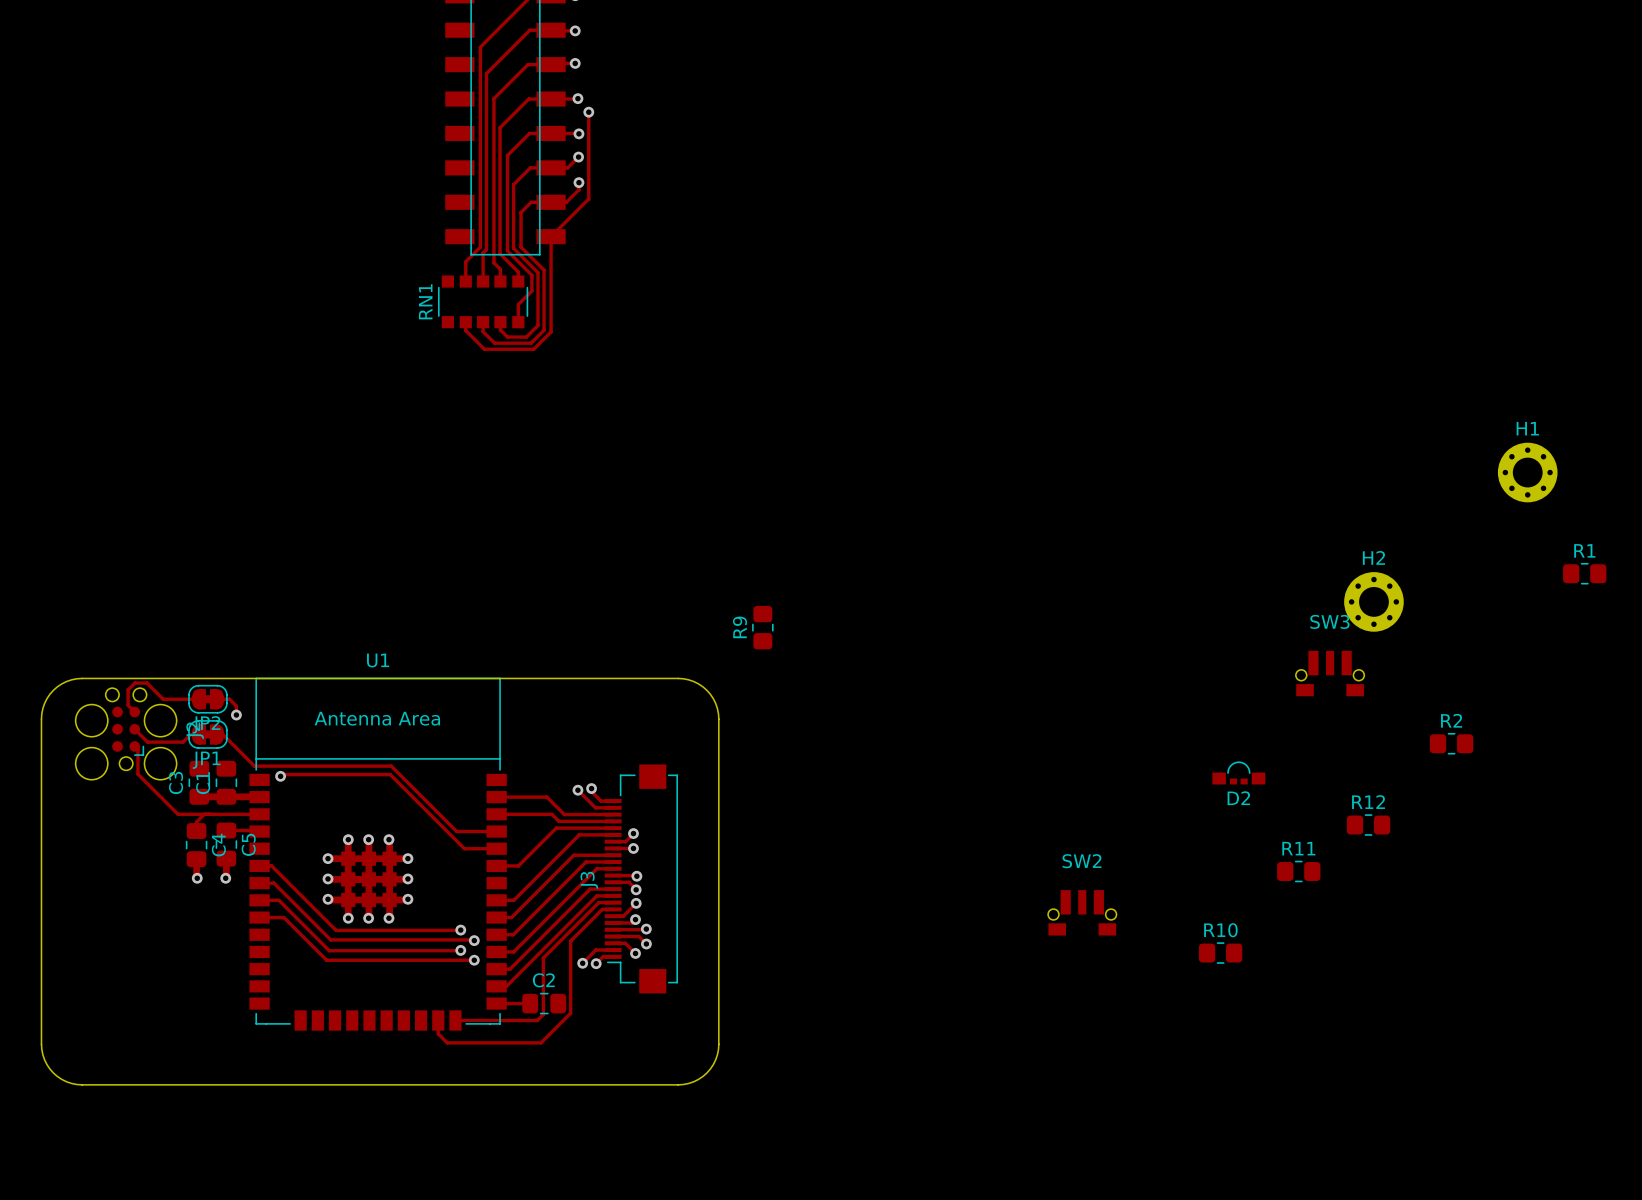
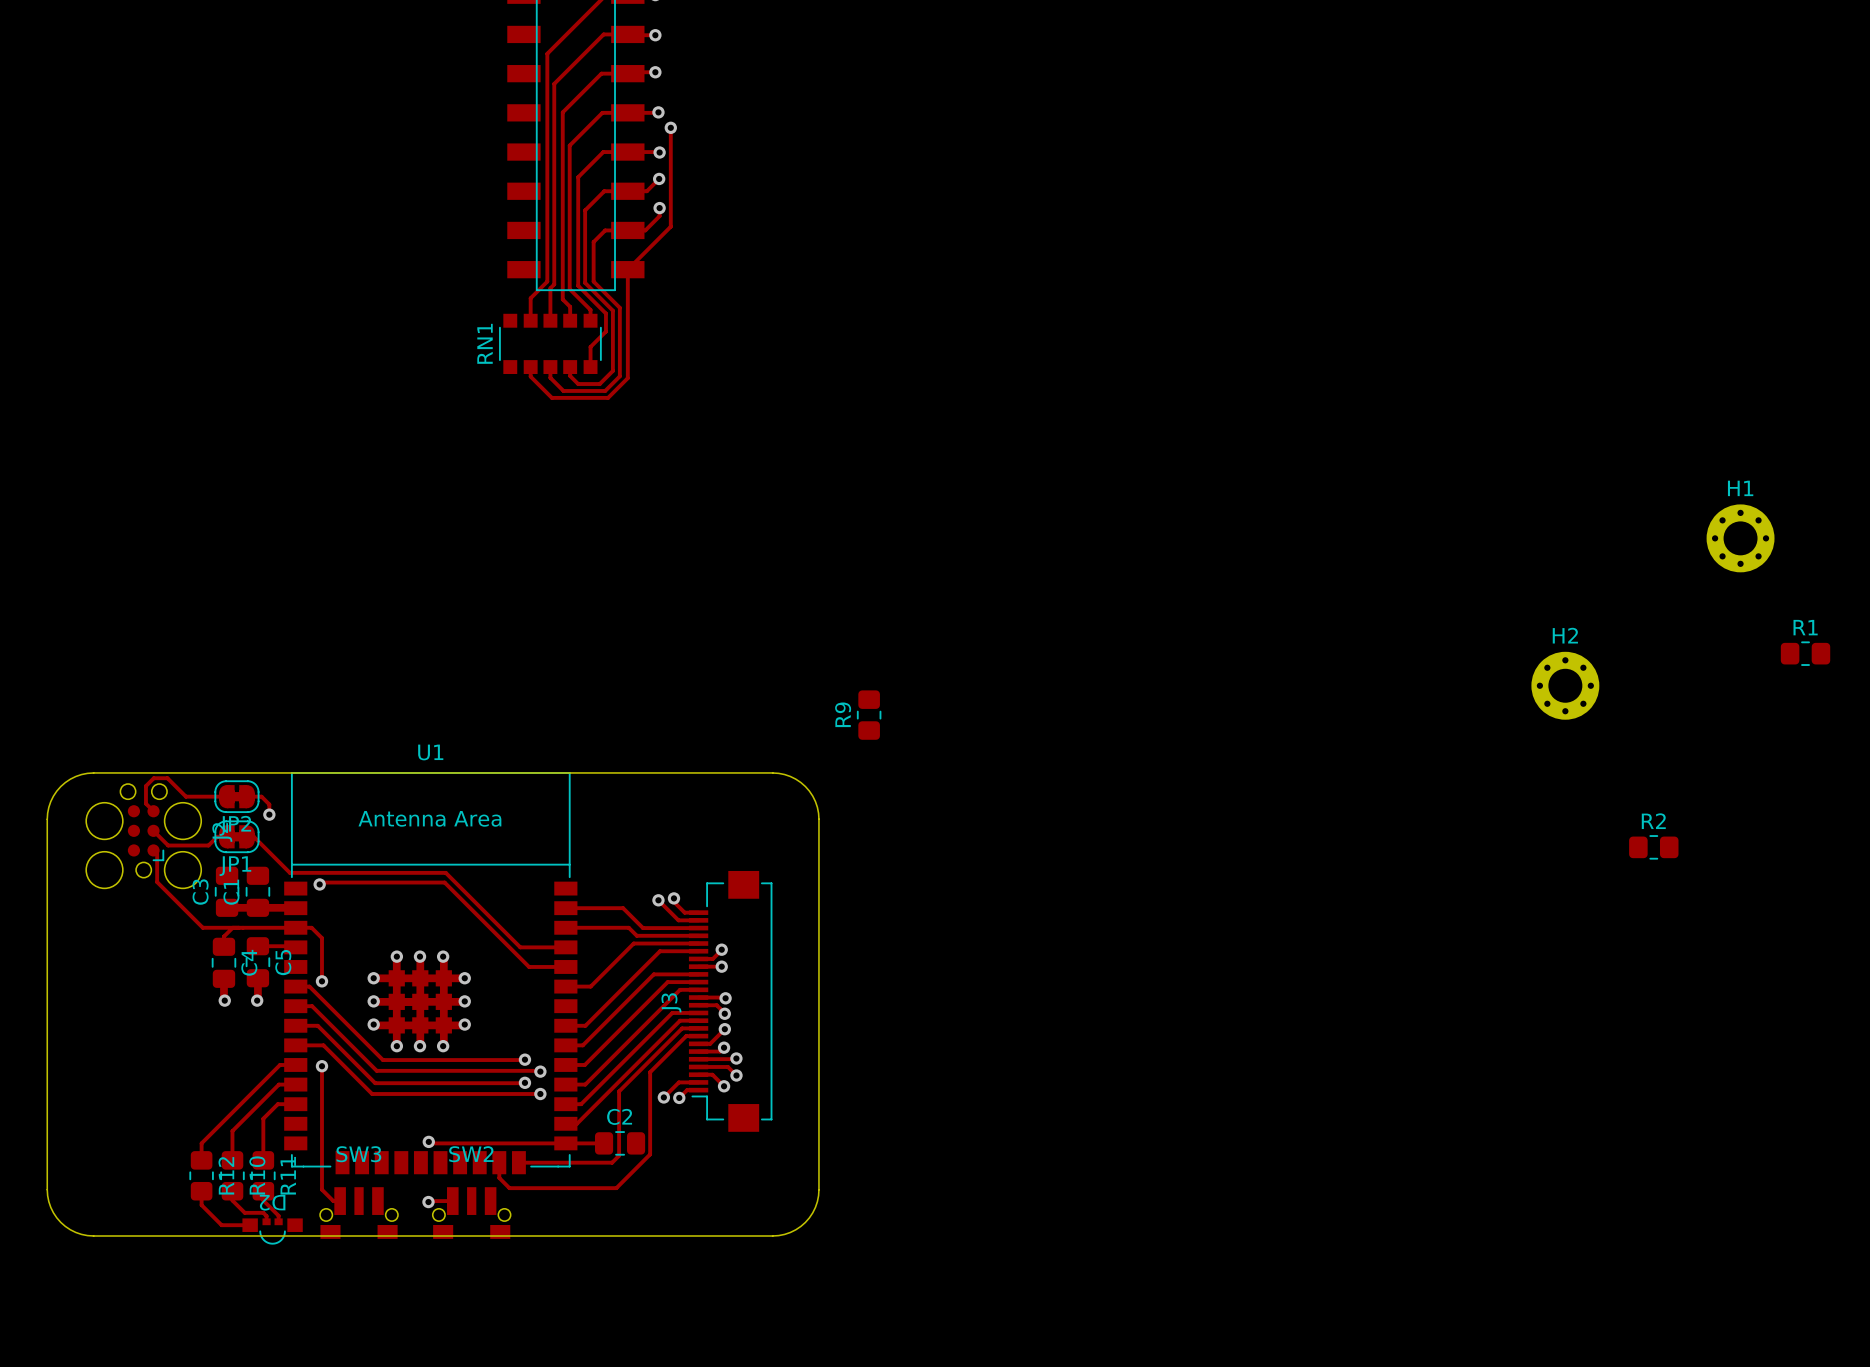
SW3 position: (1330, 673) -> (359, 1213)
D2 rotation: 0° (1236, 772) -> 180° (274, 1231)
D2 position: (1236, 772) -> (274, 1231)
track: none -> (295, 927) (311, 927) (321, 938) (321, 981)
R12 rotation: 0° (1368, 825) -> 90° clockwise (201, 1175)
R12 position: (1368, 825) -> (201, 1175)
via: none -> (321, 981)
R11 rotation: 0° (1298, 871) -> 90° clockwise (263, 1175)
R11 position: (1298, 871) -> (263, 1175)
SW2 position: (1082, 912) -> (471, 1213)
track: none -> (295, 1064) (280, 1064) (201, 1143) (201, 1160)
track: none -> (321, 1066) (321, 1189) (333, 1201) (340, 1201)
via: none -> (321, 1066)
track: none -> (295, 1084) (278, 1084) (232, 1131) (232, 1160)
R10 rotation: 0° (1220, 953) -> 90° clockwise (232, 1175)
R10 position: (1220, 953) -> (232, 1175)
track: none -> (295, 1104) (277, 1104) (263, 1118) (263, 1160)
track: none -> (428, 1141) (565, 1143)
via: none -> (428, 1141)
track: none -> (201, 1191) (201, 1205) (221, 1225) (250, 1225)
track: none -> (232, 1191) (232, 1200) (244, 1212) (263, 1212) (266, 1216) (266, 1221)
track: none -> (263, 1191) (263, 1200) (278, 1215) (278, 1221)
track: none -> (452, 1201) (428, 1202)
via: none -> (428, 1202)

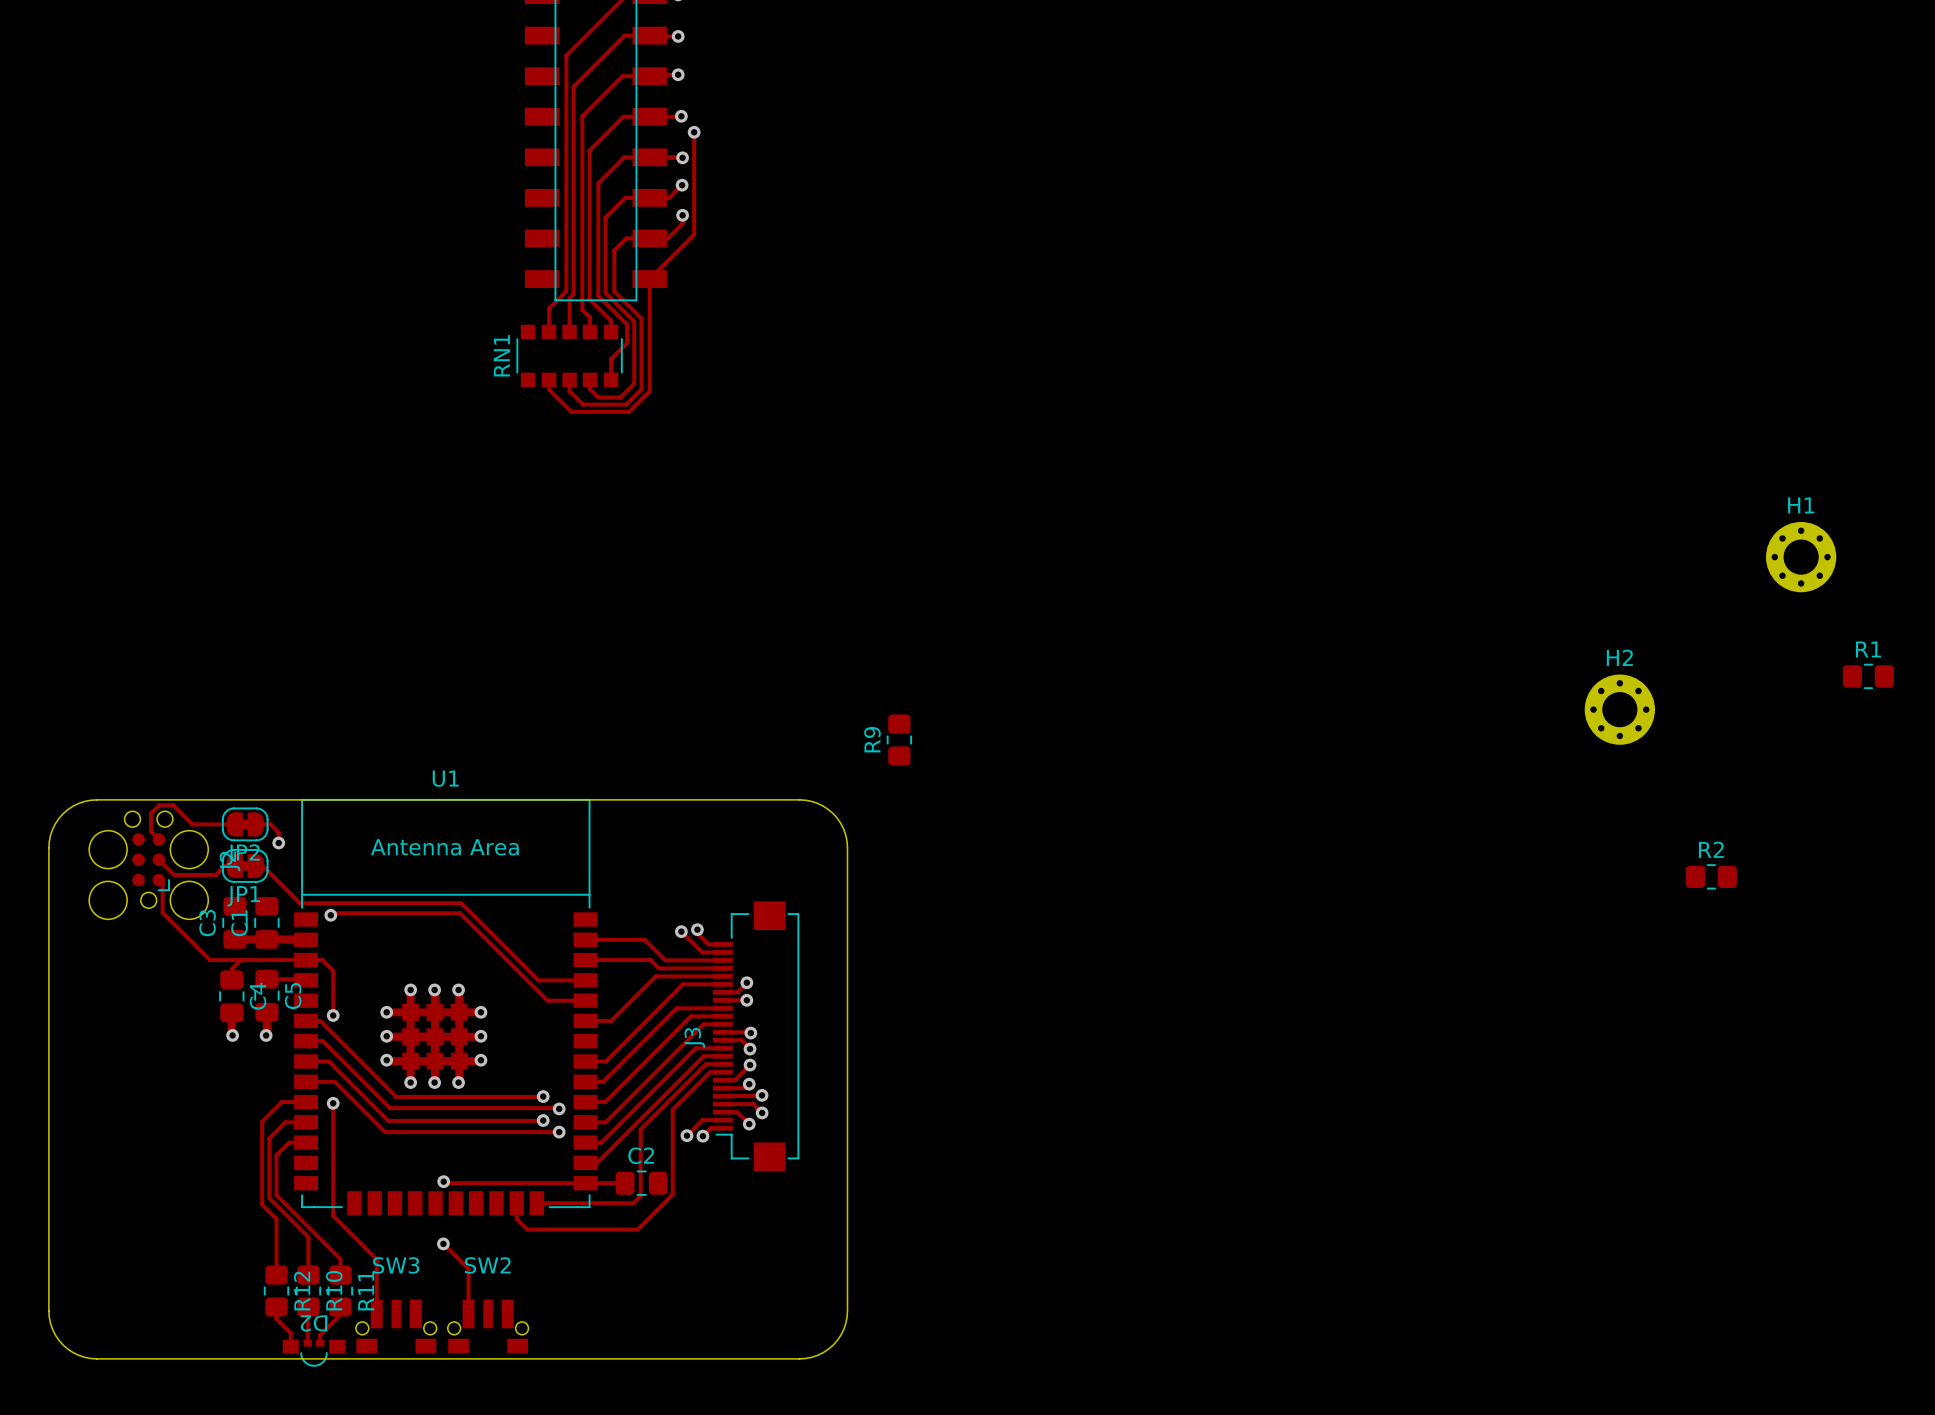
track: (280, 1064) (201, 1143) (201, 1160) -> (289, 1102) (281, 1102) (262, 1121) (262, 1204) (276, 1219) (276, 1275)
track: (278, 1084) (232, 1131) (232, 1160) -> (288, 1122) (285, 1122) (269, 1138) (269, 1198) (308, 1237) (308, 1275)
track: (279, 1104) (263, 1118) (263, 1160) -> (289, 1142) (276, 1155) (276, 1195) (340, 1259) (340, 1275)
R12 position: (201, 1175) -> (276, 1291)
R10 position: (232, 1175) -> (308, 1291)
R11 position: (263, 1175) -> (340, 1291)
track: (321, 1175) (321, 1189) (333, 1201) (340, 1201) -> (333, 1215) (376, 1259) (376, 1313)
board edge: (47, 1189) (50, 1207) (60, 1222) (75, 1232) (93, 1235) (772, 1235) (790, 1232) (805, 1222) (815, 1207) (818, 1189) -> (48, 1231) (48, 1310) (52, 1329) (58, 1340) (67, 1348) (84, 1357) (96, 1358) (805, 1358) (823, 1352) (833, 1344) (841, 1334) (845, 1323) (847, 1231)
track: (201, 1191) (201, 1205) (221, 1225) (250, 1225) -> none
track: (232, 1191) (232, 1200) (244, 1212) (263, 1212) (266, 1216) (266, 1221) -> none
track: (263, 1191) (263, 1200) (278, 1215) (278, 1221) -> none
track: (452, 1201) (428, 1202) -> (468, 1313) (468, 1269) (443, 1243)
SW3 position: (359, 1213) -> (396, 1326)
SW2 position: (471, 1213) -> (488, 1326)
D2 position: (274, 1231) -> (316, 1353)
track: none -> (276, 1306) (276, 1318) (290, 1333) (290, 1346)
track: none -> (308, 1306) (307, 1343)
track: none -> (340, 1306) (340, 1314) (320, 1335) (320, 1343)

